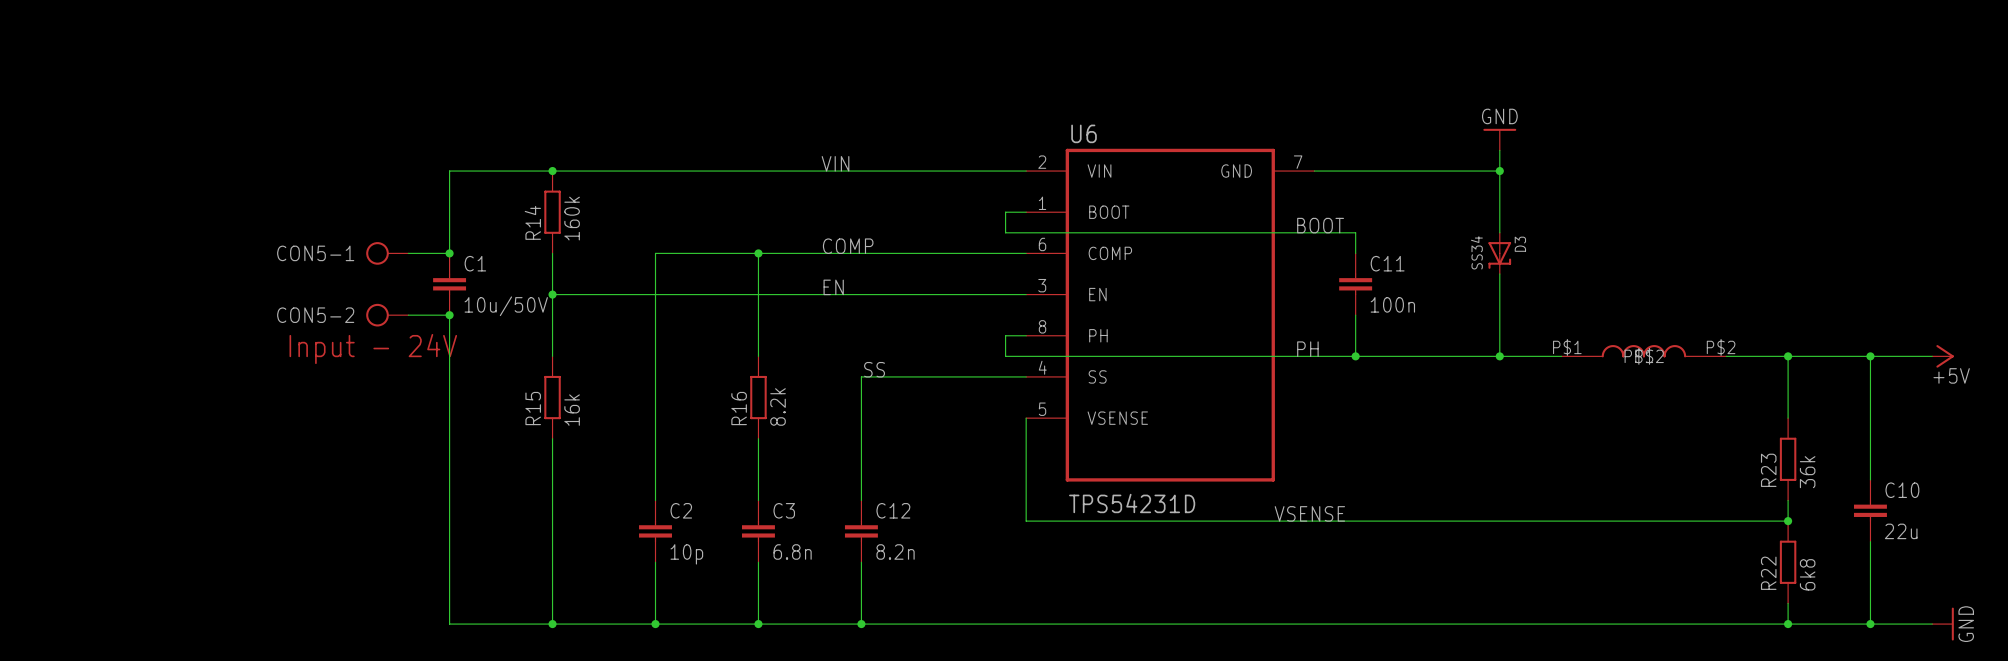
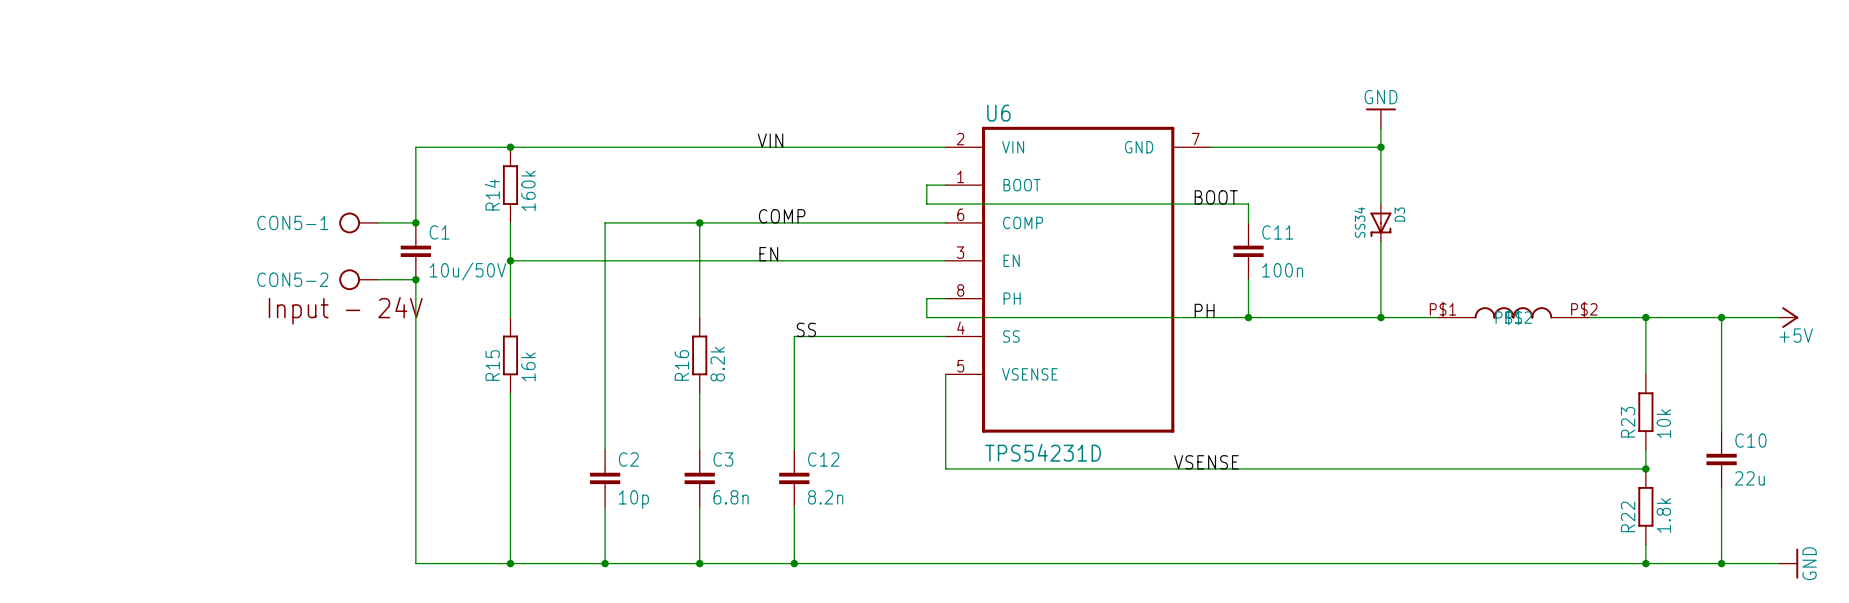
R23 value: 36k (1807, 472) -> 10k (1663, 423)
R22 value: 6k8 (1807, 574) -> 1.8k (1663, 515)

